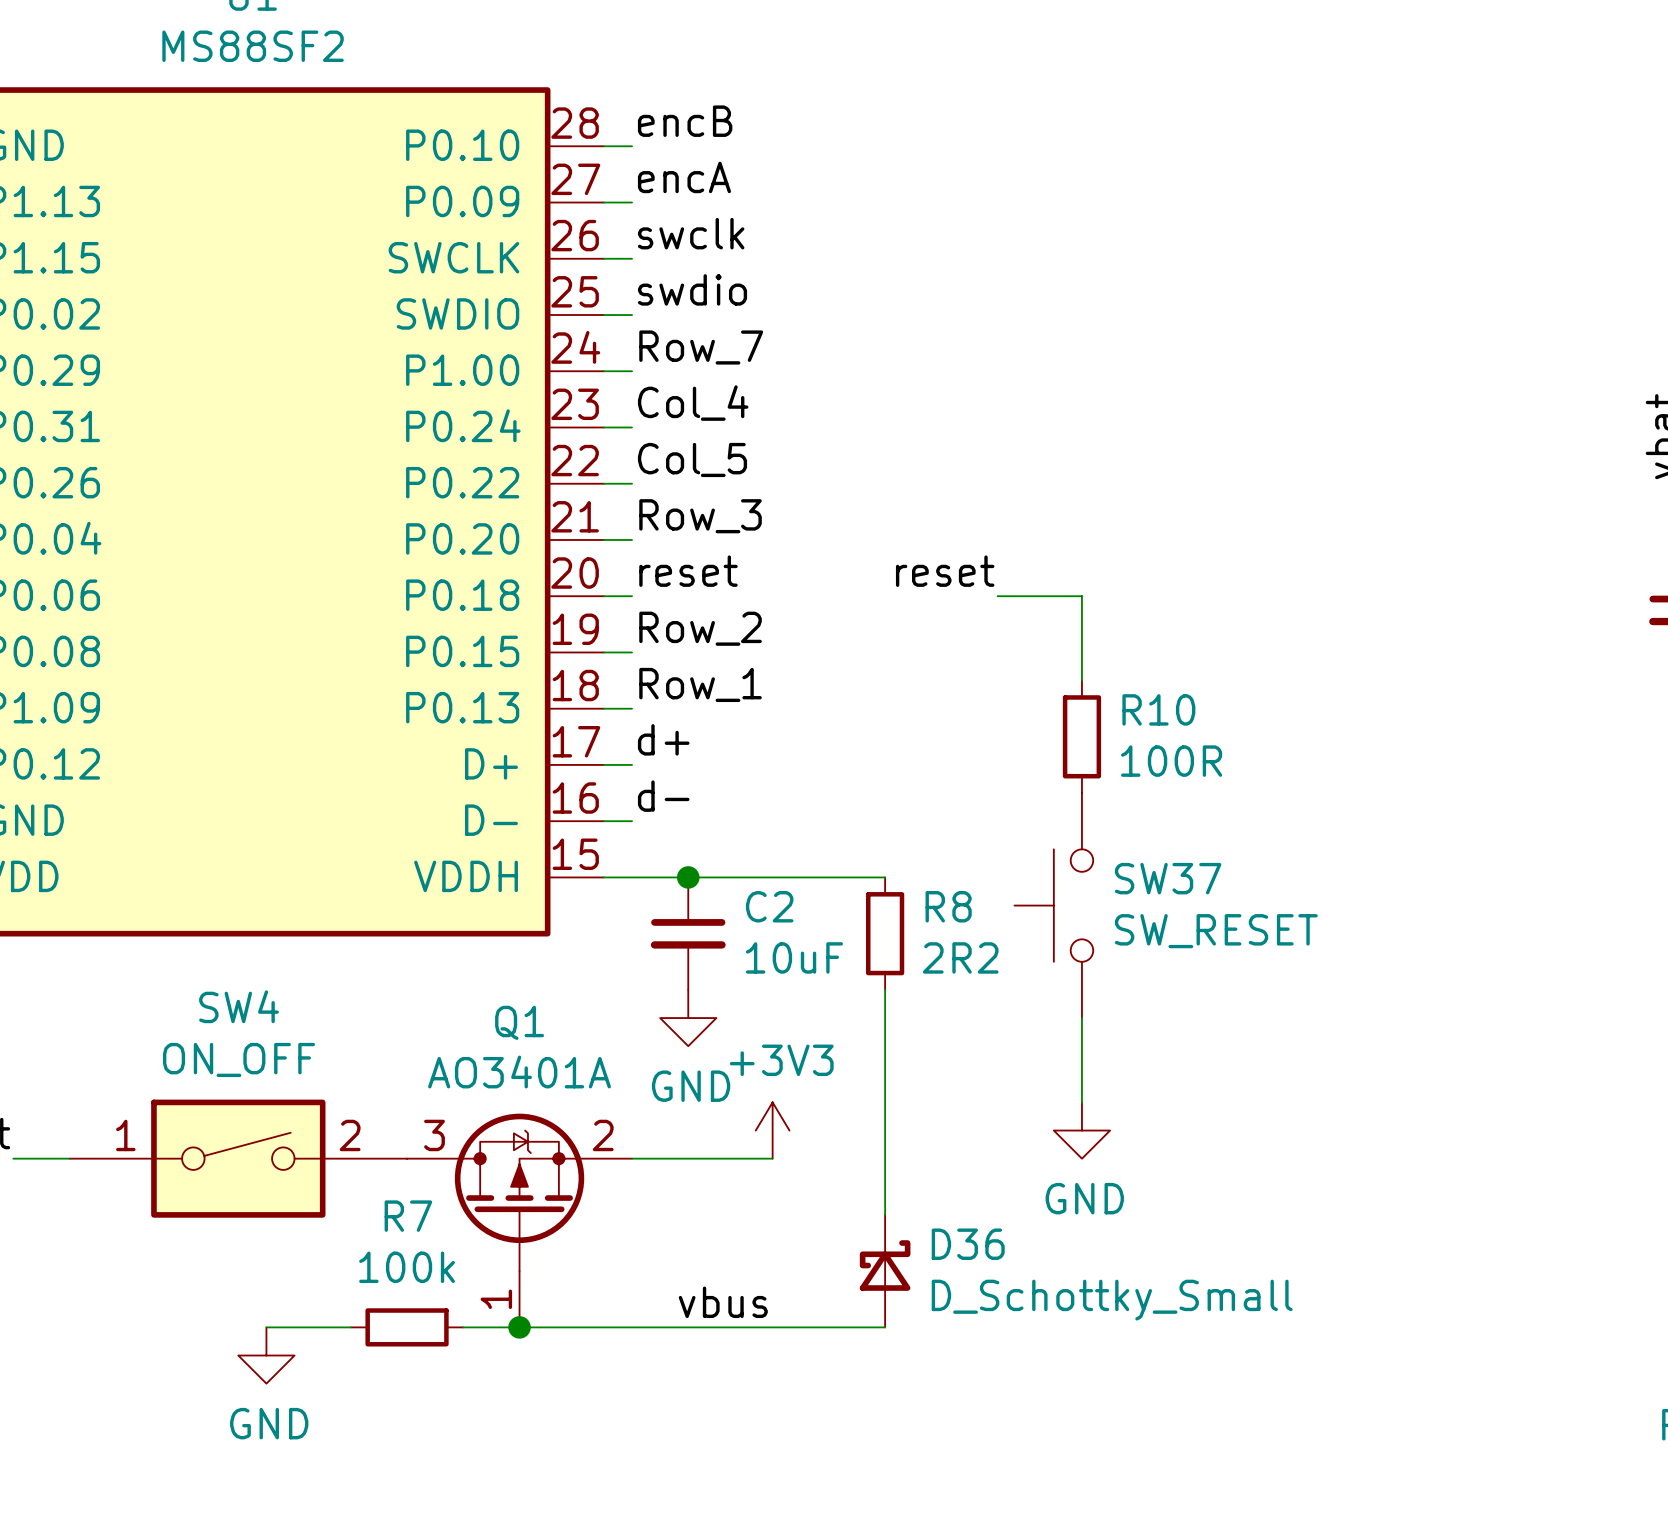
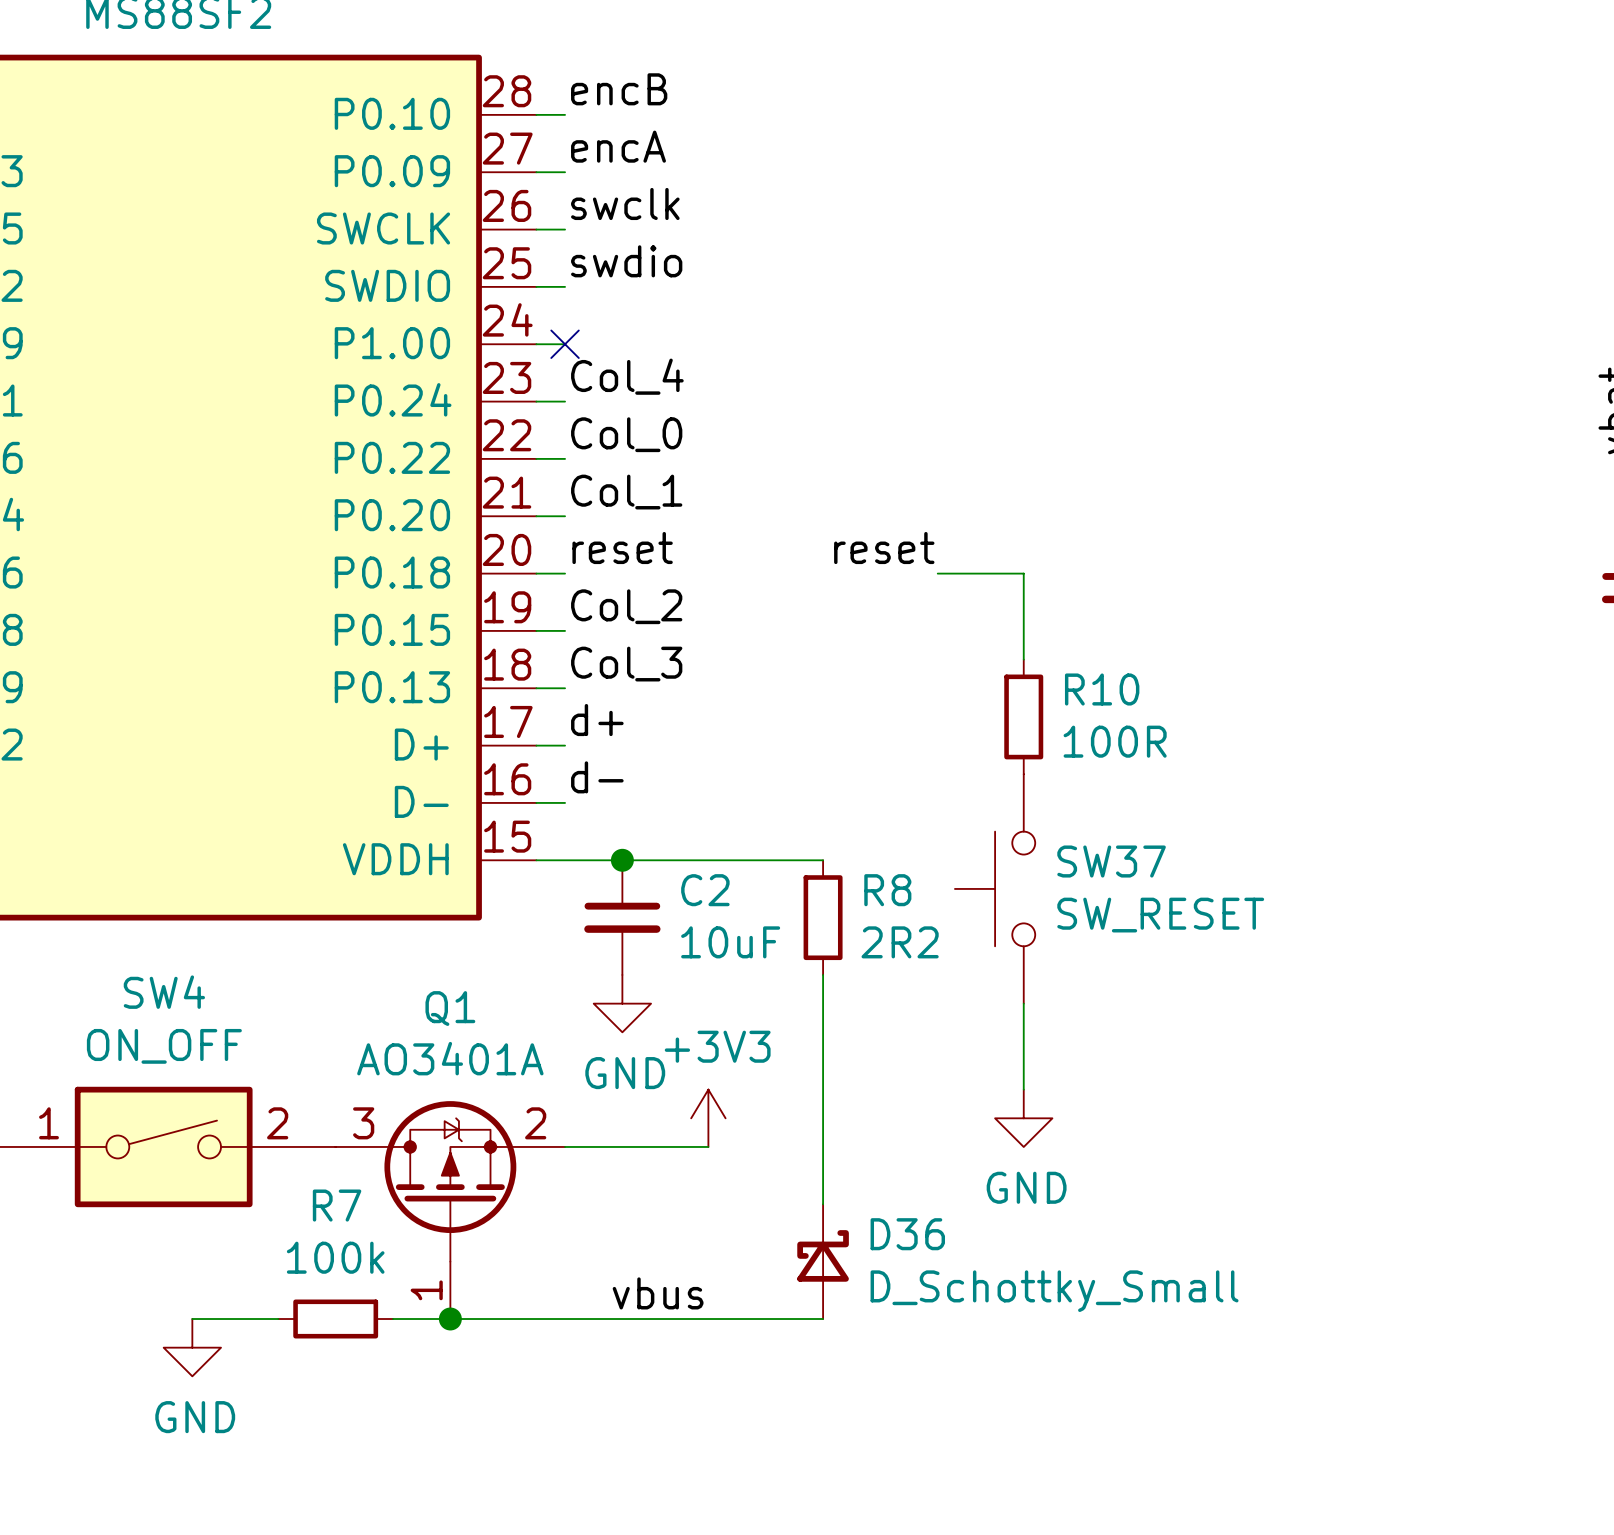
label: Row_7 (701, 347) -> none
no-connect mark: none -> (565, 344)
label: Col_5 (692, 459) -> Col_0 (626, 434)
label: Row_3 (700, 516) -> Col_1 (626, 492)
label: Row_2 (700, 628) -> Col_2 (626, 606)
label: Row_1 (700, 684) -> Col_3 (626, 664)

